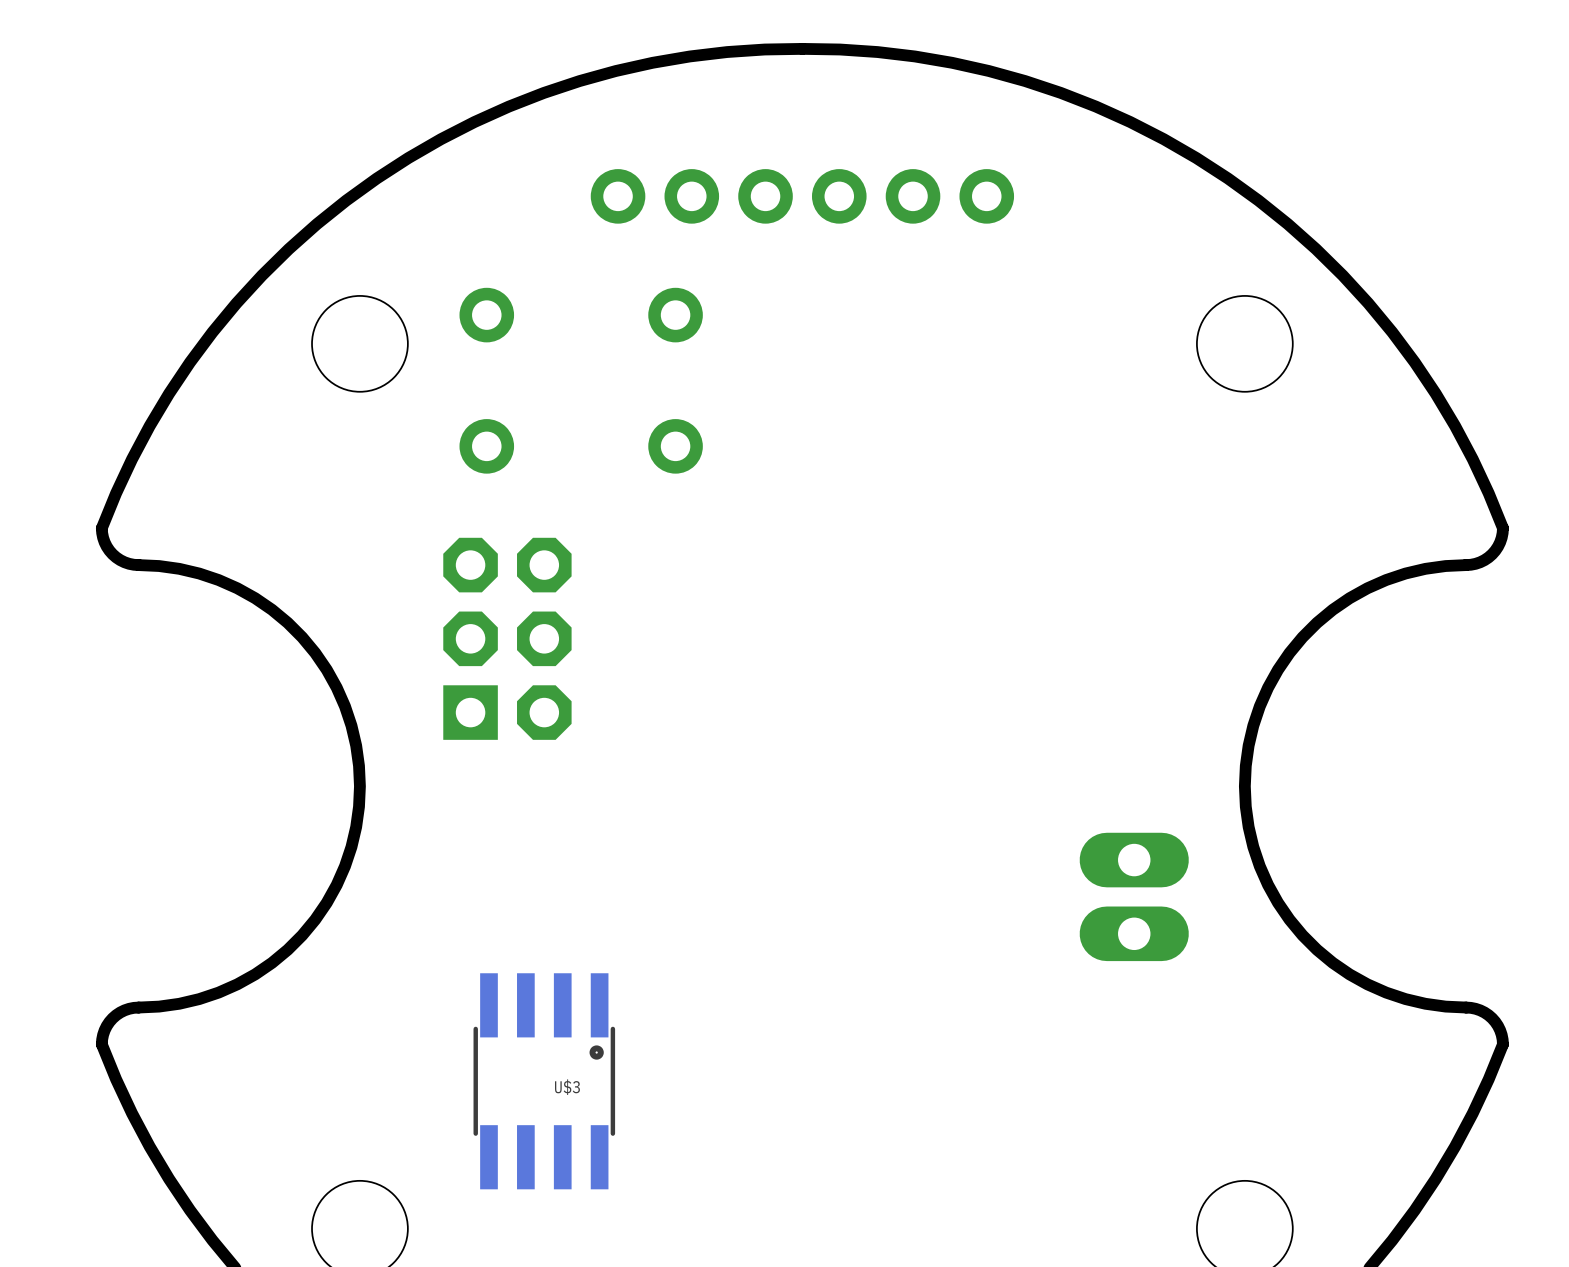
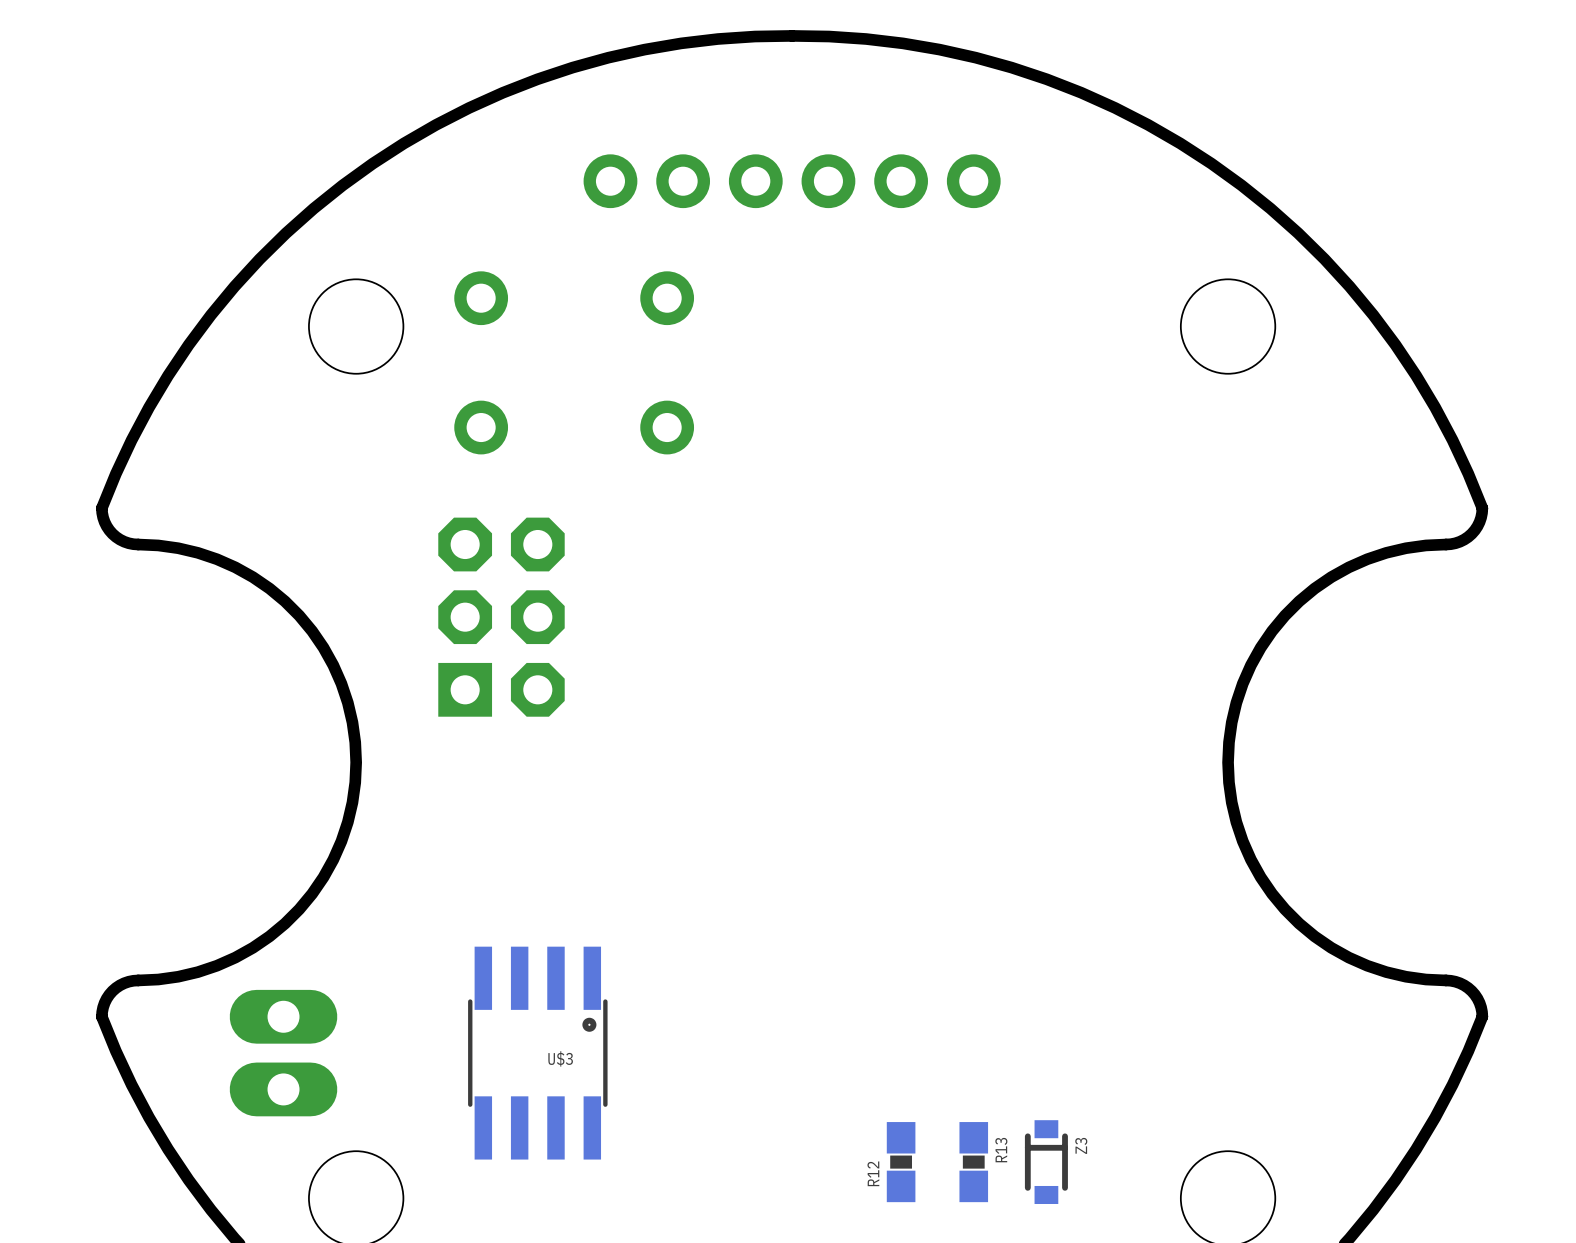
part: (1134, 896) -> none
part: none -> (283, 1053)
R12: none -> (901, 1162)
R13: none -> (973, 1162)
Z3: none -> (1046, 1162)

